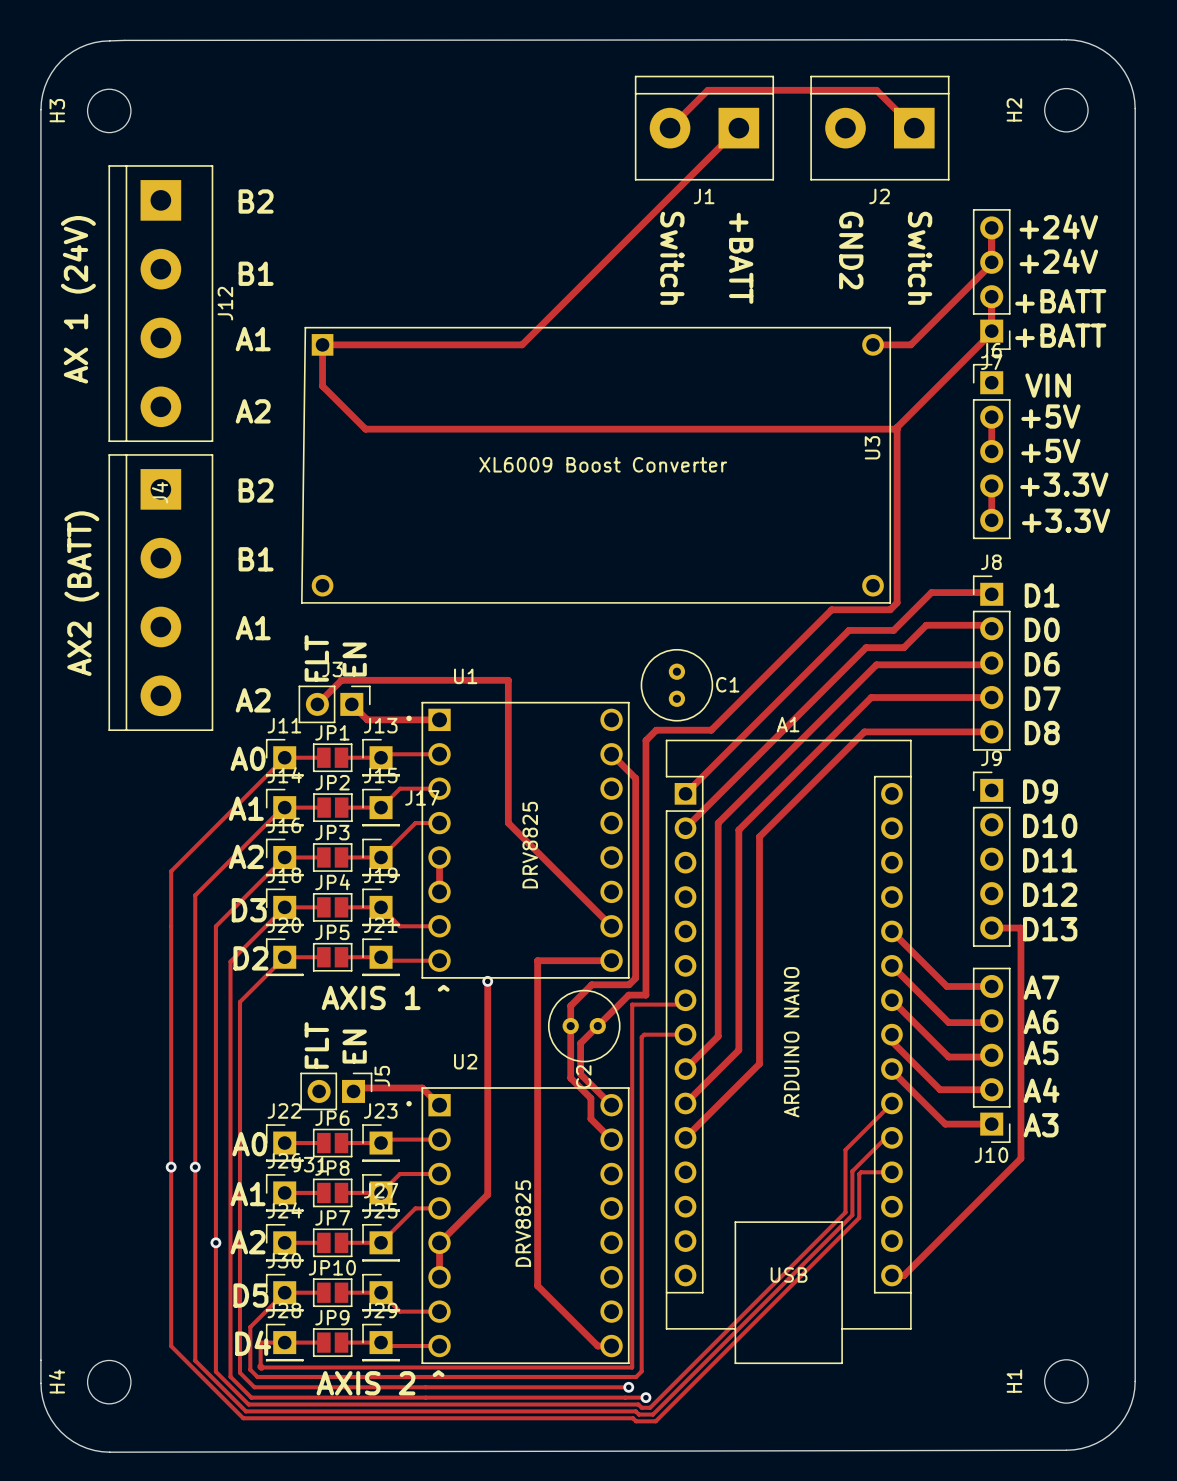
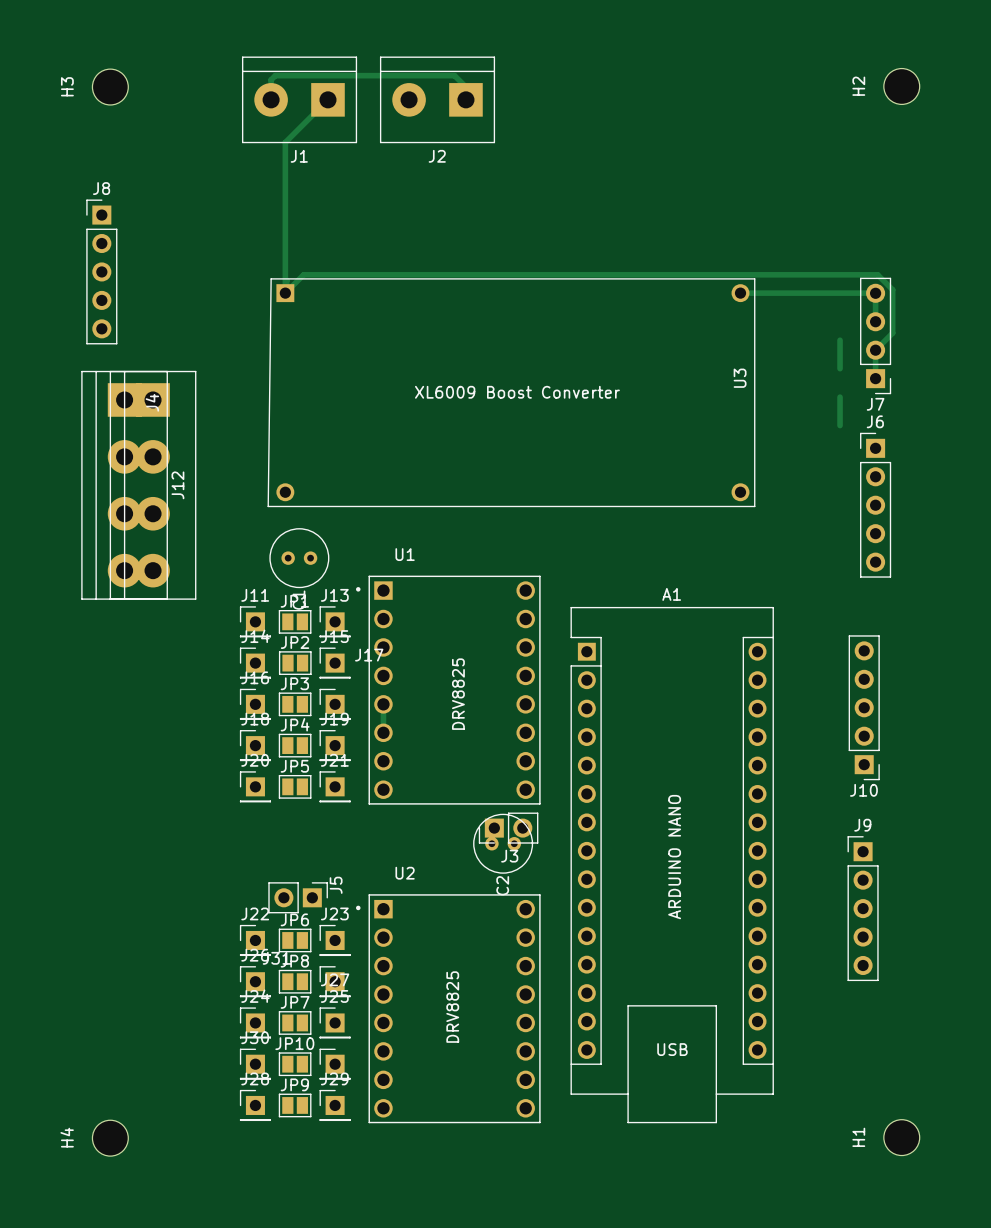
board edge: (1061, 39) (1089, 43) (1102, 50) (1115, 59) (1124, 71) (1131, 85) (1135, 108) (1135, 1381) (1131, 1404) (1124, 1418) (1109, 1435) (1096, 1443) (1081, 1448) (1066, 1450) (109, 1452) (94, 1450) (73, 1441) (61, 1432) (51, 1419) (44, 1406) (40, 1383) (40, 109) (44, 86) (51, 73) (61, 61) (73, 51) (87, 44) (109, 40) (1061, 39) -> none
track: none -> (271, 99) (271, 79) (275, 75) (454, 75) (465, 87) (465, 99)
track: none -> (327, 99) (285, 142) (285, 293) (303, 274) (877, 274) (892, 289) (892, 333) (875, 350) (875, 378)
track: (670, 128) (707, 90) (876, 90) (914, 128) -> none
J1 position: (704, 128) -> (299, 99)
track: (738, 128) (522, 344) (322, 344) -> none
J2 position: (879, 128) -> (437, 99)
text: B2 (256, 201) -> none
text: +24V (1058, 226) -> none
track: (991, 227) (991, 264) (910, 344) (873, 344) -> none
text: GND2 (851, 250) -> none
text: Switch (672, 258) -> none
text: +BATT (741, 258) -> none
text: Switch (920, 258) -> none
text: +24V (1058, 261) -> none
text: B1 (256, 273) -> none
J7 position: (991, 279) -> (875, 335)
track: (991, 296) (991, 332) (897, 427) (897, 602) (890, 609) (831, 609) (711, 730) (656, 730) (645, 740) (645, 995) (628, 995) (580, 1043) (580, 1074) (611, 1105) -> none
text: AX 1 (24V) (78, 299) -> none
text: +BATT (1060, 301) -> none
J12 position: (160, 303) -> (124, 485)
text: +BATT (1060, 335) -> none
text: A1 (253, 339) -> none
track: none -> (740, 293) (875, 293) (875, 321)
track: (322, 361) (322, 386) (365, 429) (897, 429) -> none
text: VIN (1048, 385) -> none
text: A2 (253, 411) -> none
text: +5V (1050, 416) -> none
text: +5V (1050, 450) -> none
J6 position: (991, 451) -> (875, 505)
U3 position: (596, 465) -> (511, 392)
text: +3.3V (1064, 484) -> none
text: B2 (256, 490) -> none
text: +3.3V (1066, 520) -> none
text: B1 (256, 559) -> none
text: AX2 (BATT) (81, 593) -> none
track: (991, 594) (990, 592) (931, 592) (893, 630) (848, 630) (685, 793) -> none
text: D1 (1042, 595) -> none
text: A1 (253, 628) -> none
track: (991, 628) (988, 625) (926, 625) (903, 647) (866, 647) (685, 828) -> none
text: D0 (1042, 629) -> none
text: FLT (316, 658) -> none
text: EN (354, 659) -> none
track: (991, 663) (990, 664) (876, 664) (718, 823) (718, 1036) (685, 1069) -> none
J8 position: (991, 663) -> (101, 271)
text: D6 (1042, 664) -> none
C1 rotation: 0° (676, 685) -> 90° clockwise (299, 558)
C1 position: (676, 685) -> (299, 558)
track: (991, 697) (871, 697) (738, 829) (738, 1050) (685, 1103) -> none
text: D7 (1042, 698) -> none
text: A2 (253, 700) -> none
track: (317, 704) (341, 680) (508, 680) (508, 823) (611, 926) -> none
J3 rotation: 0° (334, 704) -> 180° (508, 828)
J3 position: (334, 704) -> (508, 828)
track: (351, 704) (367, 719) (439, 719) -> none
track: (991, 731) (864, 731) (759, 836) (759, 1063) (685, 1137) -> none
text: D8 (1042, 733) -> none
track: (439, 754) (384, 754) (381, 757) (341, 757) -> none
track: (611, 754) (635, 778) (635, 978) (629, 984) (591, 984) (570, 1005) (570, 1078) (590, 1098) (590, 1118) (611, 1139) -> none
track: (323, 757) (284, 757) (171, 871) (171, 1346) (243, 1418) (633, 1418) (636, 1421) (655, 1421) (859, 1217) (859, 1174) (860, 1172) (891, 1172) -> none
text: A0 (248, 758) -> none
track: (439, 788) (399, 788) (381, 807) (341, 807) -> none
text: D9 (1040, 791) -> none
track: (324, 807) (283, 807) (195, 895) (195, 1360) (245, 1411) (635, 1411) (638, 1414) (652, 1414) (852, 1215) (852, 1171) (885, 1137) (891, 1137) -> none
text: A1 (246, 808) -> none
track: (439, 823) (415, 823) (381, 857) (341, 857) -> none
text: D10 (1050, 825) -> none
text: A2 (246, 856) -> none
track: (323, 857) (284, 857) (215, 926) (215, 1371) (248, 1404) (638, 1404) (641, 1407) (650, 1407) (845, 1212) (845, 1149) (891, 1103) -> none
J9 position: (991, 859) -> (863, 908)
text: D11 (1050, 860) -> none
text: D12 (1050, 894) -> none
track: (323, 907) (284, 907) (230, 961) (230, 1376) (251, 1397) (645, 1397) -> none
track: (341, 907) (381, 907) (399, 926) (439, 926) -> none
text: D3 (249, 910) -> none
track: (991, 928) (1020, 928) (1020, 1158) (903, 1275) (891, 1275) -> none
text: D13 (1050, 929) -> none
track: (891, 931) (946, 986) (991, 986) -> none
track: (323, 957) (284, 957) (239, 1001) (239, 1372) (254, 1387) (628, 1387) -> none
track: (341, 957) (381, 957) (384, 960) (439, 960) -> none
text: D2 (250, 958) -> none
track: (611, 960) (537, 960) (537, 1285) (597, 1346) (611, 1346) -> none
track: (891, 965) (948, 1022) (990, 1022) (991, 1020) -> none
track: (487, 981) (487, 1194) (439, 1242) (439, 1277) -> none
via: (487, 981) -> none
text: A7 (1041, 987) -> none
text: AXIS 1 ^ (385, 997) -> none
track: (685, 1000) (681, 1004) (632, 1004) (632, 1367) (260, 1366) (260, 1342) (323, 1342) -> none
track: (891, 1000) (948, 1057) (990, 1057) (991, 1055) -> none
text: A6 (1041, 1022) -> none
track: (685, 1034) (644, 1034) (641, 1037) (641, 1371) (636, 1376) (257, 1376) (250, 1369) (250, 1327) (284, 1292) (323, 1292) -> none
track: (891, 1034) (891, 1041) (940, 1089) (991, 1089) -> none
text: FLT (316, 1045) -> none
text: EN (354, 1046) -> none
text: A5 (1041, 1052) -> none
J10 position: (991, 1055) -> (864, 707)
track: (891, 1069) (945, 1124) (991, 1124) -> none
text: A4 (1041, 1090) -> none
track: (353, 1091) (356, 1087) (422, 1087) (439, 1105) -> none
text: A3 (1041, 1125) -> none
track: (439, 1139) (384, 1139) (381, 1143) (341, 1143) -> none
track: (284, 1143) (323, 1143) -> none
text: A0 (249, 1144) -> none
via: (171, 1167) -> none
via: (195, 1167) -> none
track: (439, 1174) (399, 1174) (381, 1192) (341, 1192) -> none
track: (284, 1192) (323, 1192) -> none
text: A1 (248, 1194) -> none
track: (439, 1208) (415, 1208) (381, 1242) (341, 1242) -> none
via: (215, 1242) -> none
text: A2 (248, 1242) -> none
track: (284, 1242) (323, 1242) -> none
track: (341, 1292) (381, 1292) (399, 1311) (439, 1311) -> none
text: D5 (250, 1295) -> none
track: (341, 1342) (381, 1342) (384, 1346) (439, 1346) -> none
text: D4 (253, 1343) -> none
text: AXIS 2 ^ (380, 1382) -> none
via: (628, 1387) -> none
via: (645, 1397) -> none

